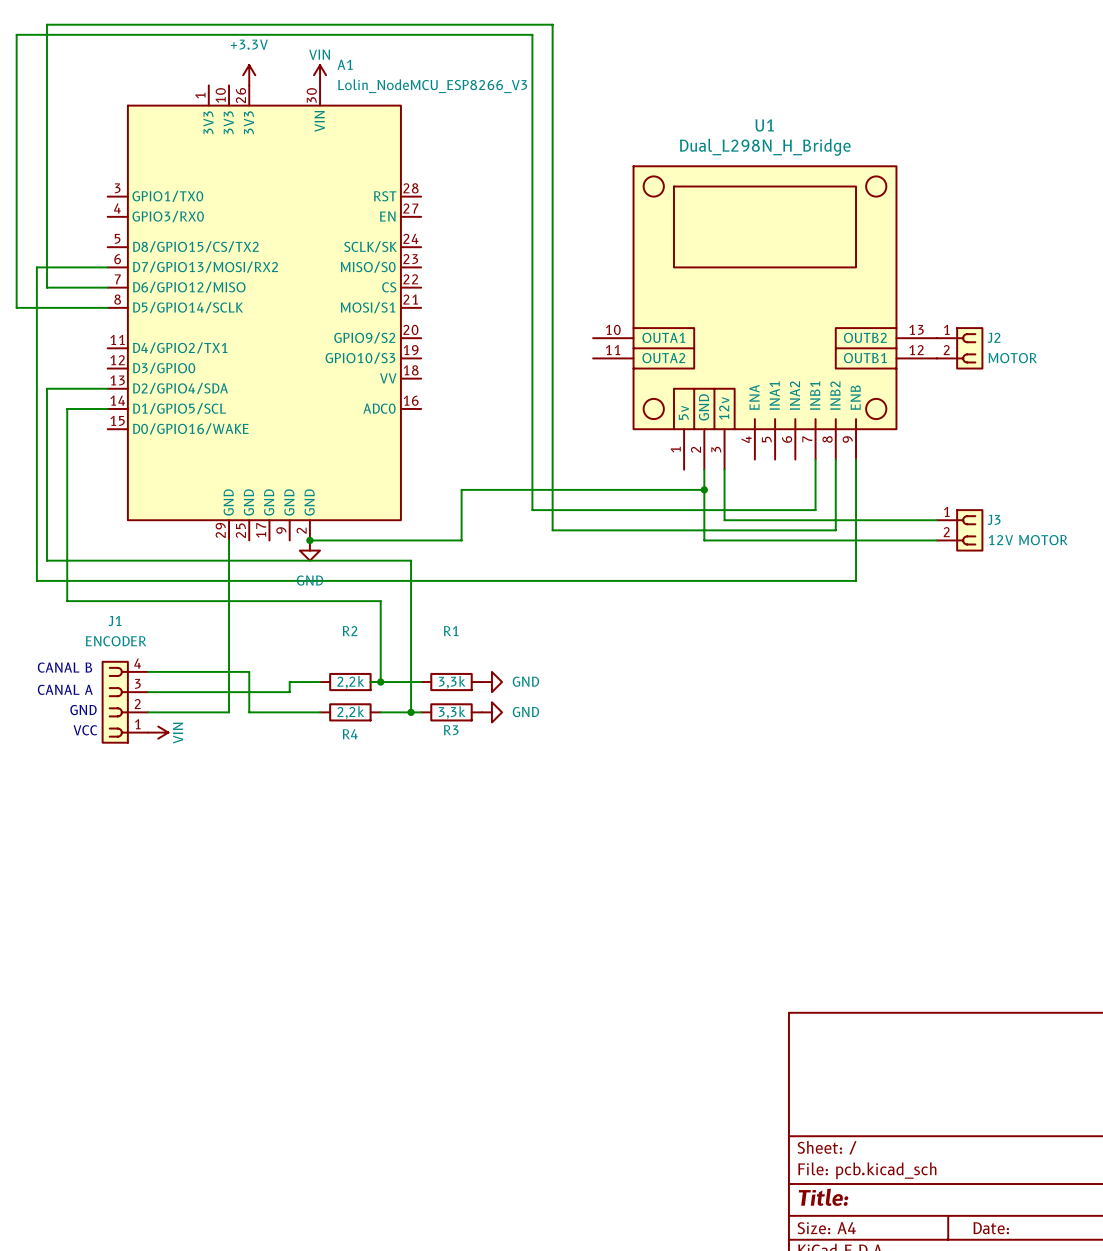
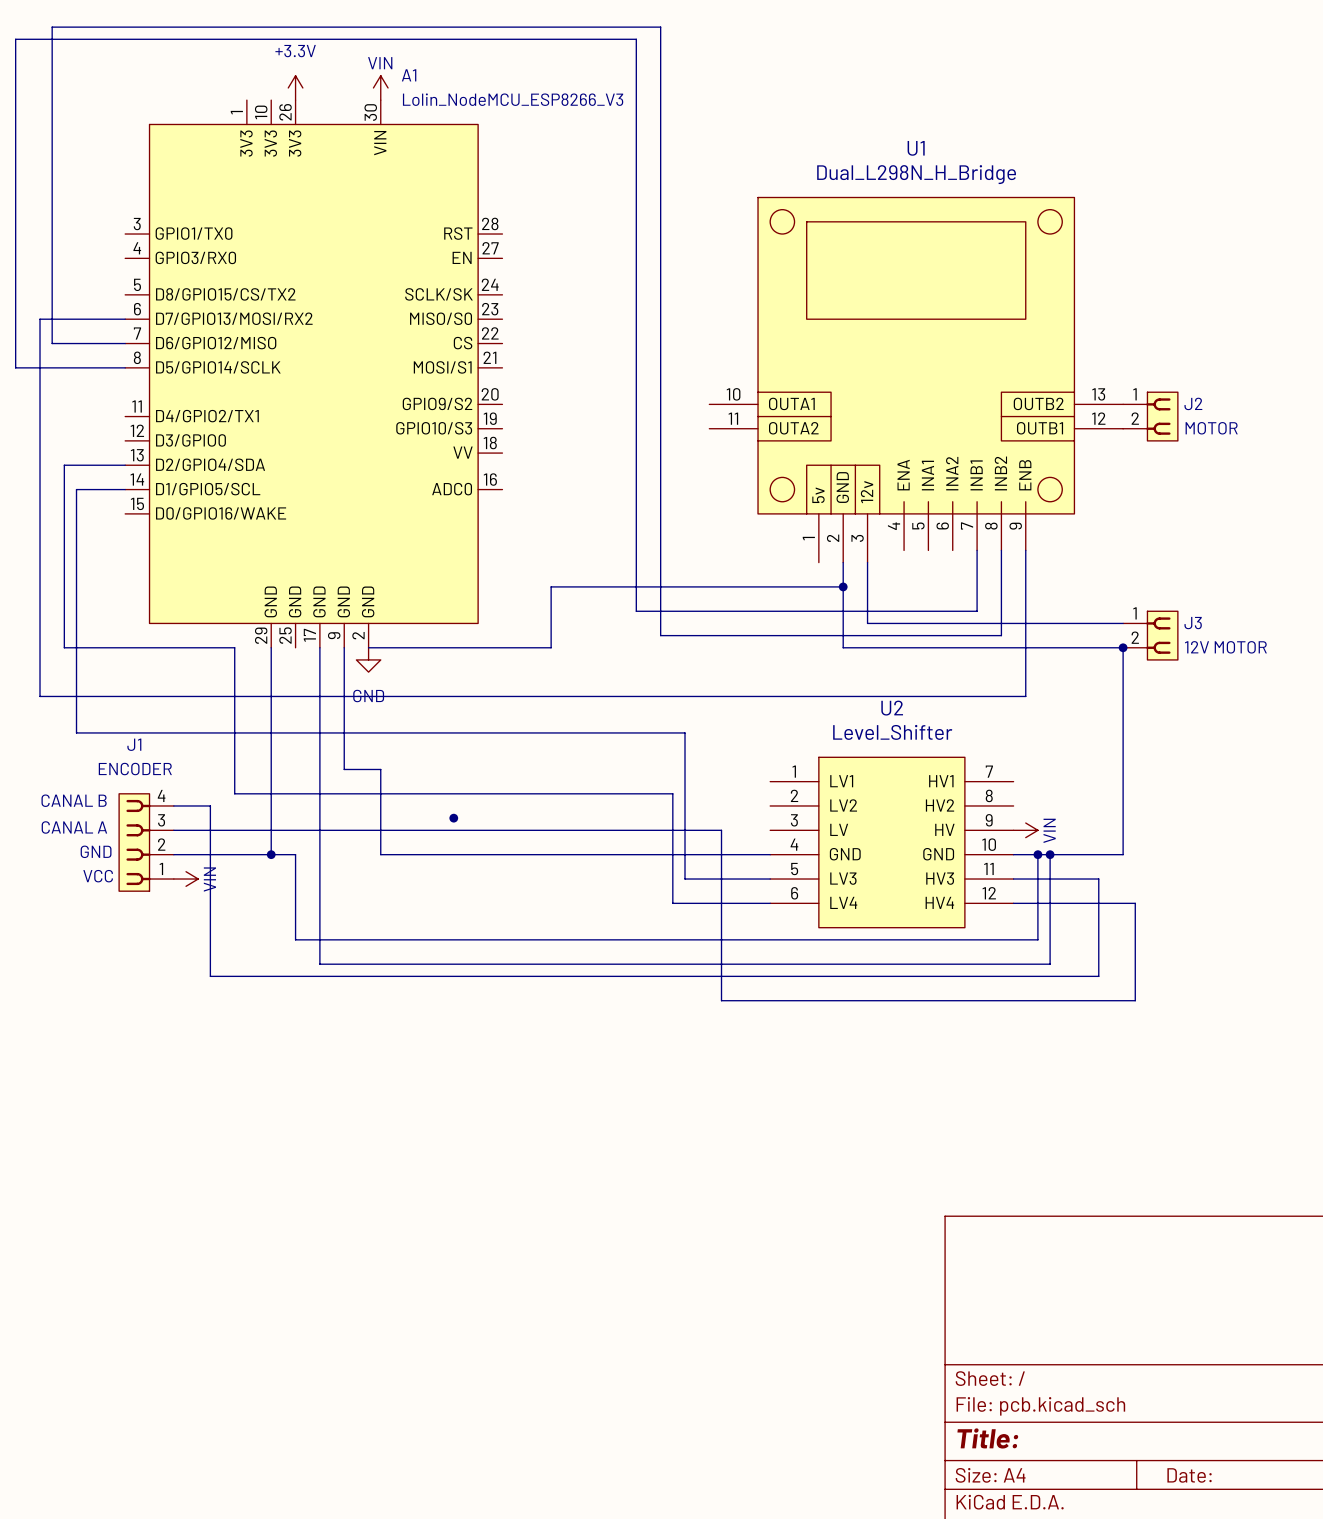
wire: (57, 388) (46, 388) (46, 560) (411, 560) (411, 712) -> (64, 465) (64, 647) (234, 647) (234, 793) (672, 793) (672, 903) (770, 903)
wire: none -> (319, 647) (319, 964) (1050, 964) (1050, 854)
wire: none -> (344, 647) (344, 769) (380, 769) (380, 854) (453, 854)
junction: (309, 540) -> none
wire: none -> (1123, 647) (1123, 854) (1013, 854)
junction: none -> (1123, 647)
wire: (67, 601) (380, 601) (380, 682) -> (76, 720) (76, 732) (685, 732) (685, 879) (770, 879)
wire: (178, 671) (249, 671) (249, 712) (320, 712) -> (210, 805) (210, 976) (1098, 976) (1098, 879) (1013, 879)
wire: (320, 682) (289, 682) (289, 692) -> (1013, 903) (1135, 903) (1135, 1000) (721, 1000) (721, 830) (344, 830)
R2: 2,2k (350, 682) -> none
wire: (370, 682) (421, 682) -> none
R1: 3,3k (451, 682) -> none
power symbol: GND (491, 682) -> none
power symbol: none -> VIN (1025, 830)
U2: none -> Level_Shifter (891, 842)
wire: none -> (271, 854) (295, 854) (295, 939) (1037, 939) (1037, 854)
junction: none -> (271, 854)
R4: 2,2k (350, 712) -> none
junction: (411, 712) -> none
wire: none -> (502, 854) (770, 854)
R3: 3,3k (451, 712) -> none
power symbol: GND (491, 712) -> none
junction: none -> (1037, 854)
junction: none -> (1050, 854)

